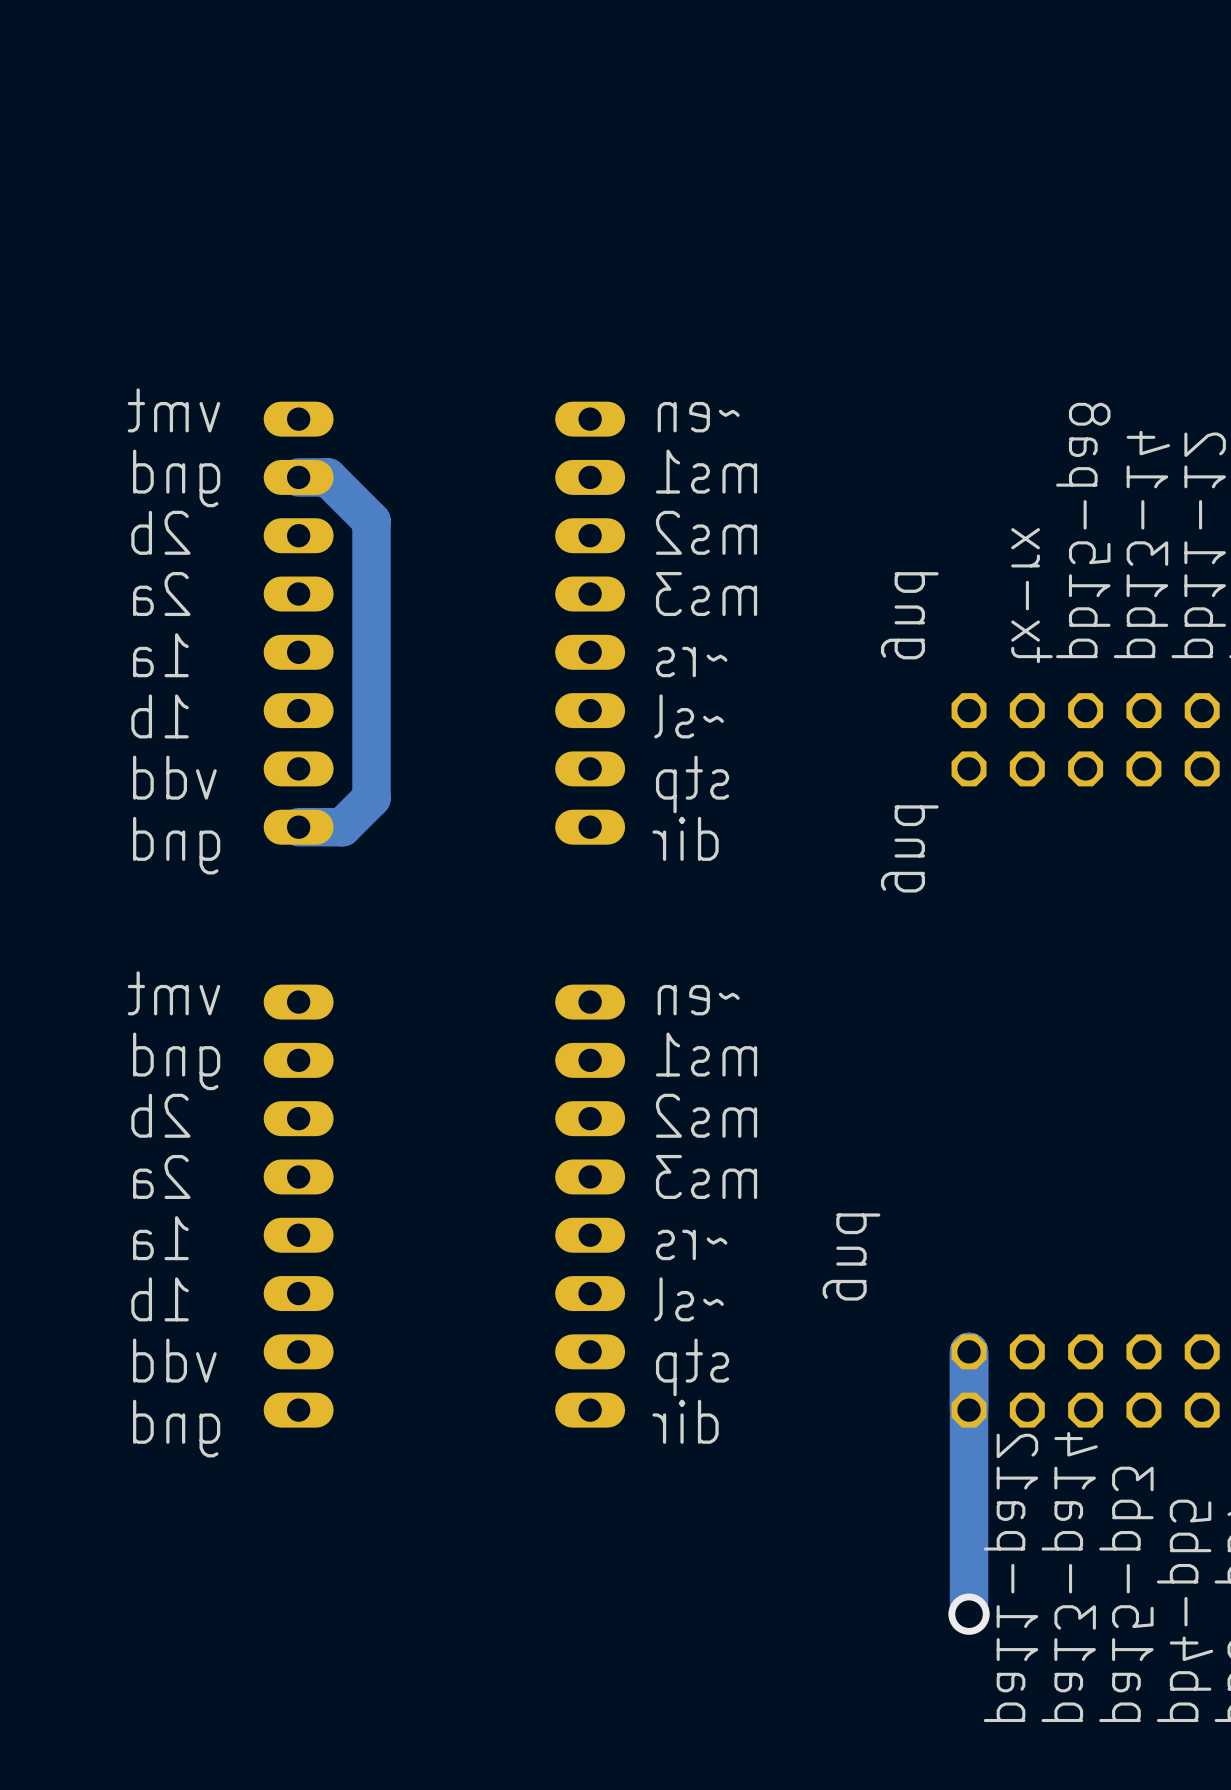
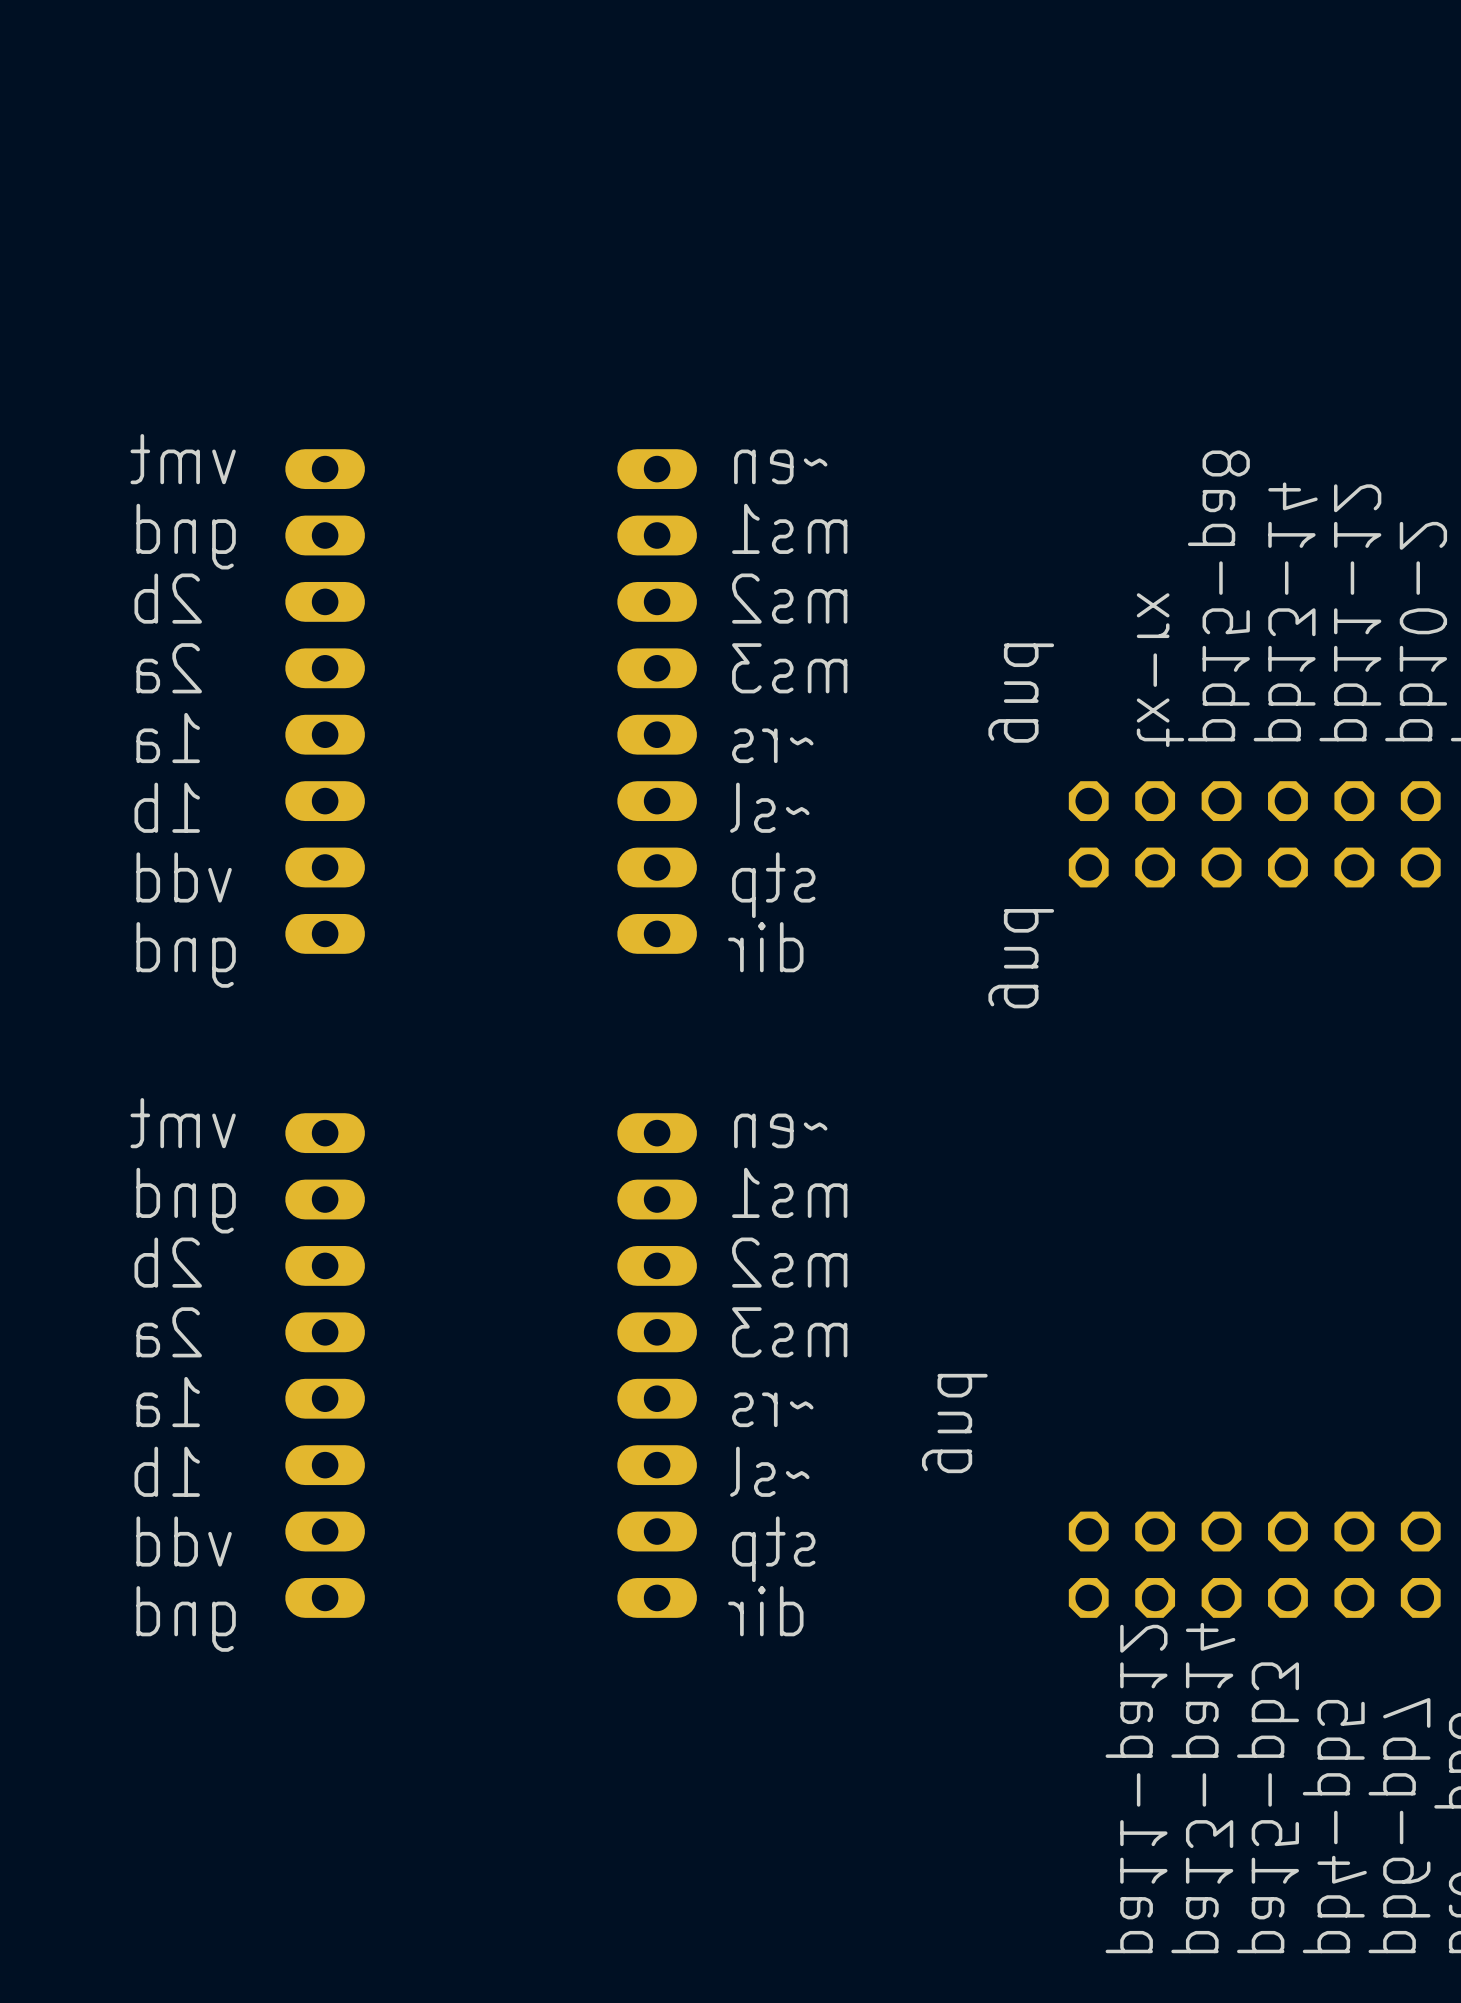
track: (298, 477) (327, 477) (371, 521) (371, 798) (342, 827) (298, 827) -> none
track: (969, 1351) (969, 1614) -> none
via: (969, 1614) -> none

